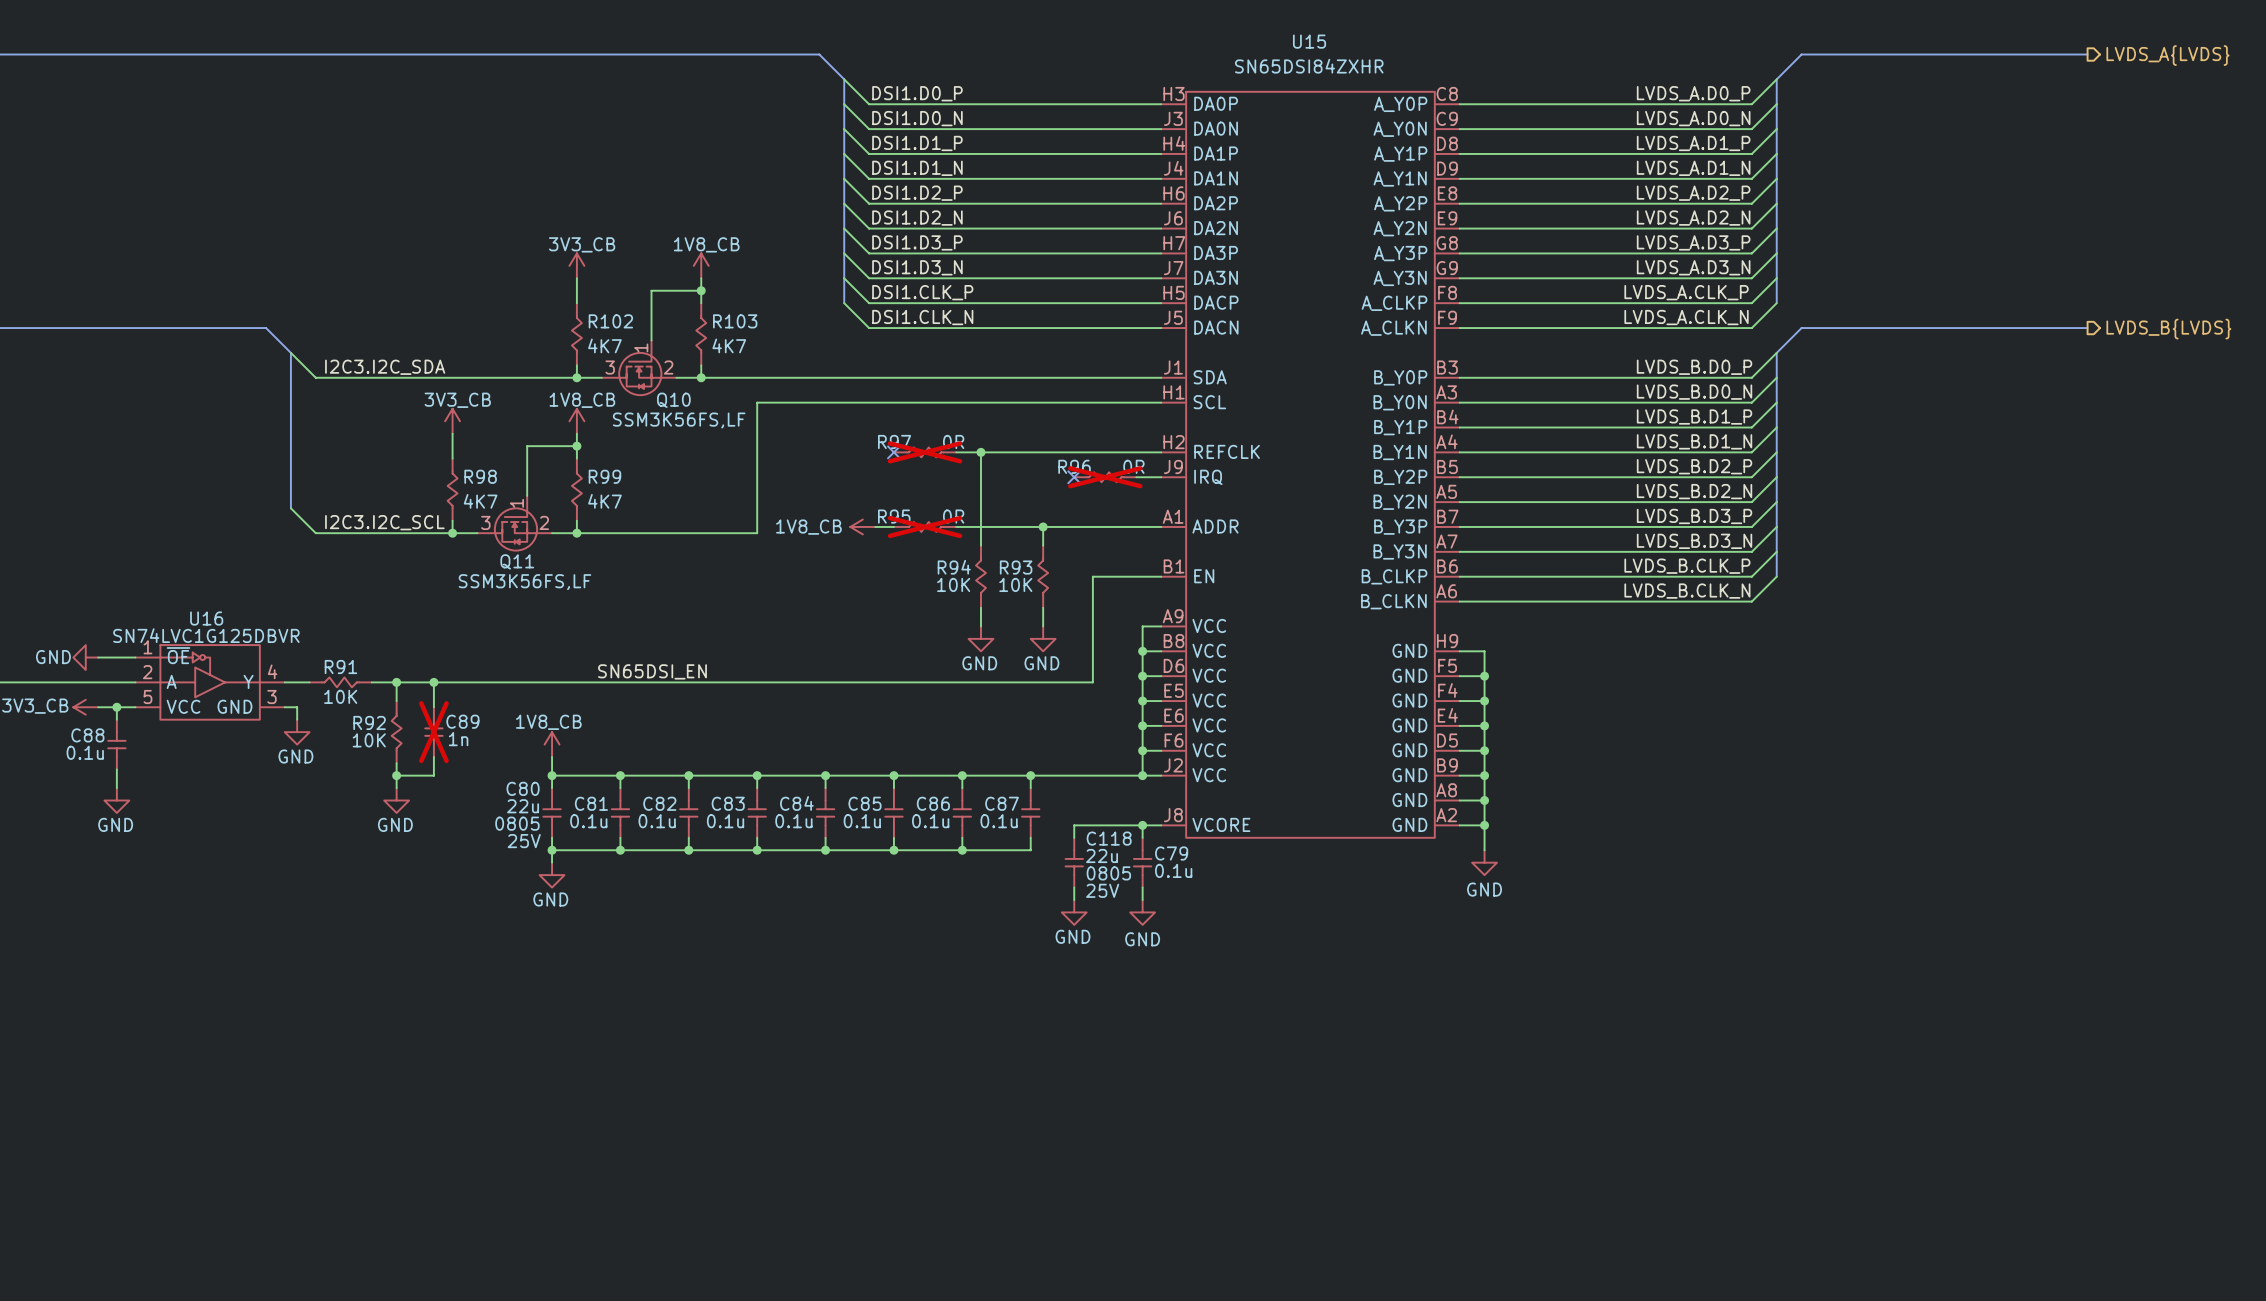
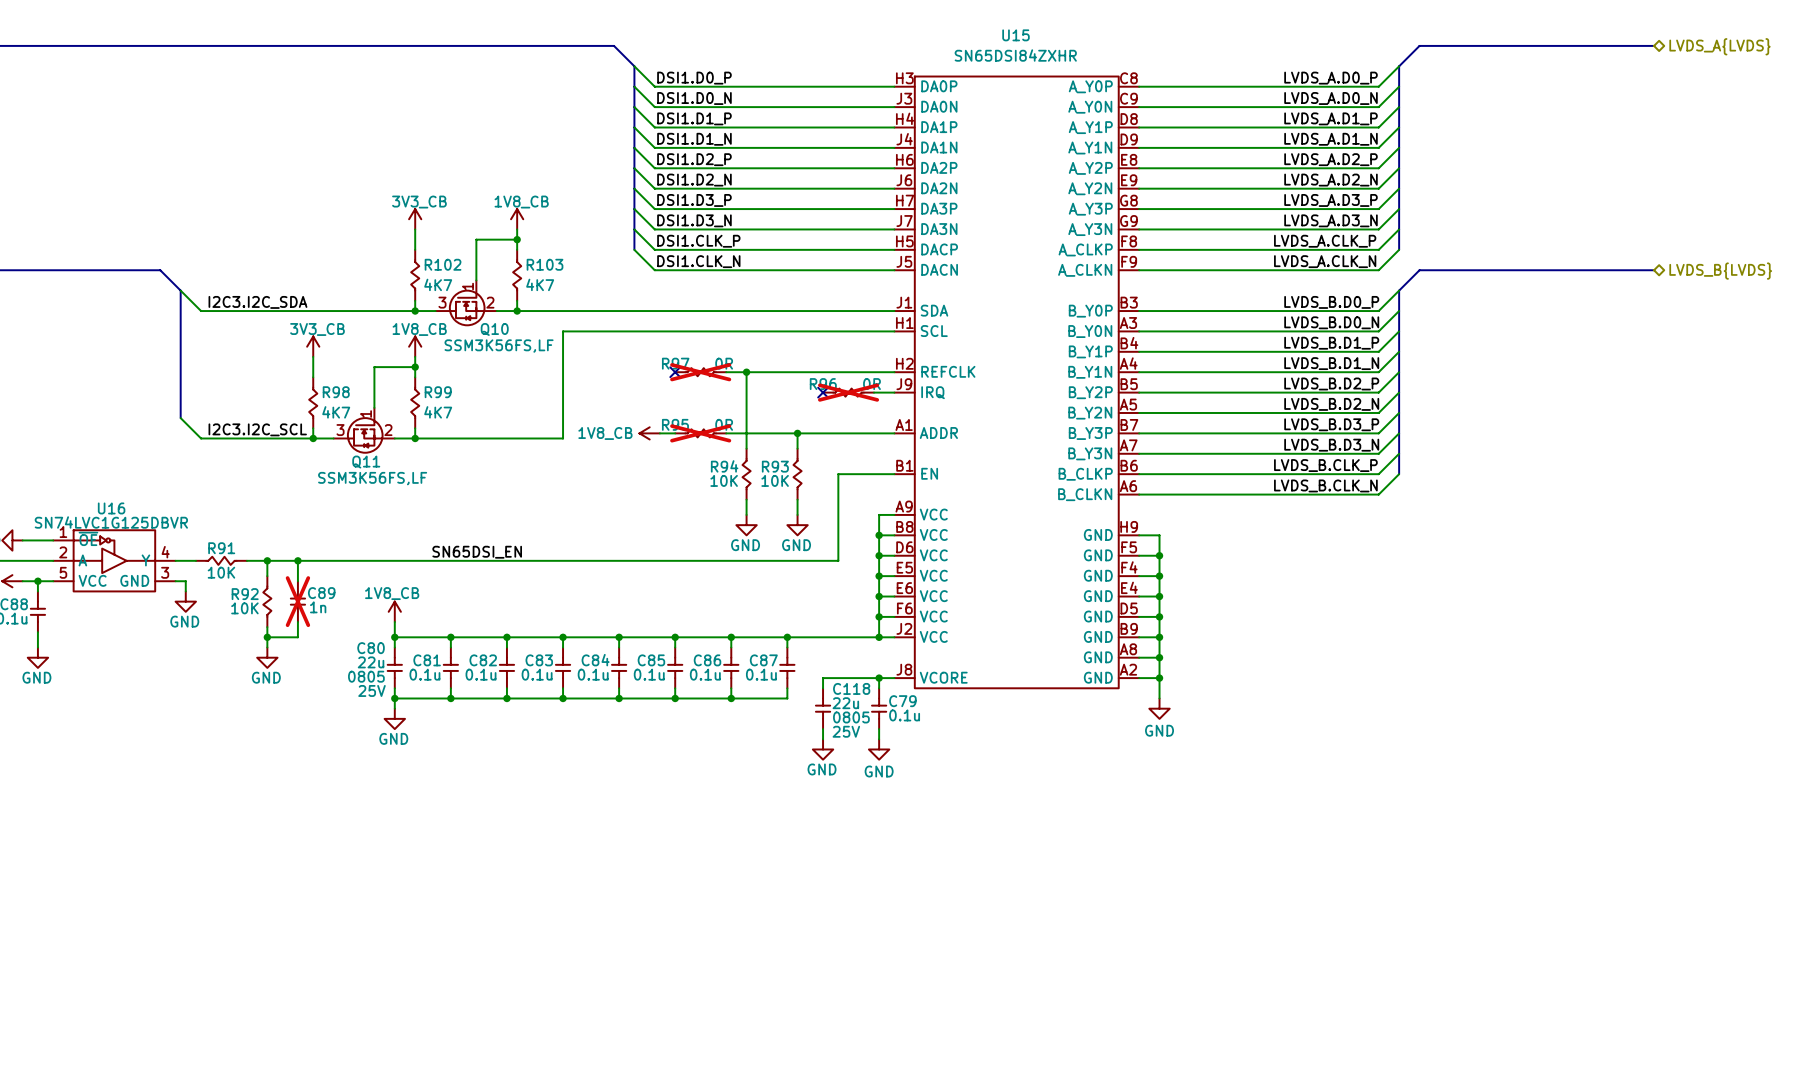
hierarchical label shape: output (2167, 55) -> bidirectional (1719, 46)
hierarchical label shape: output (2168, 329) -> bidirectional (1720, 271)

